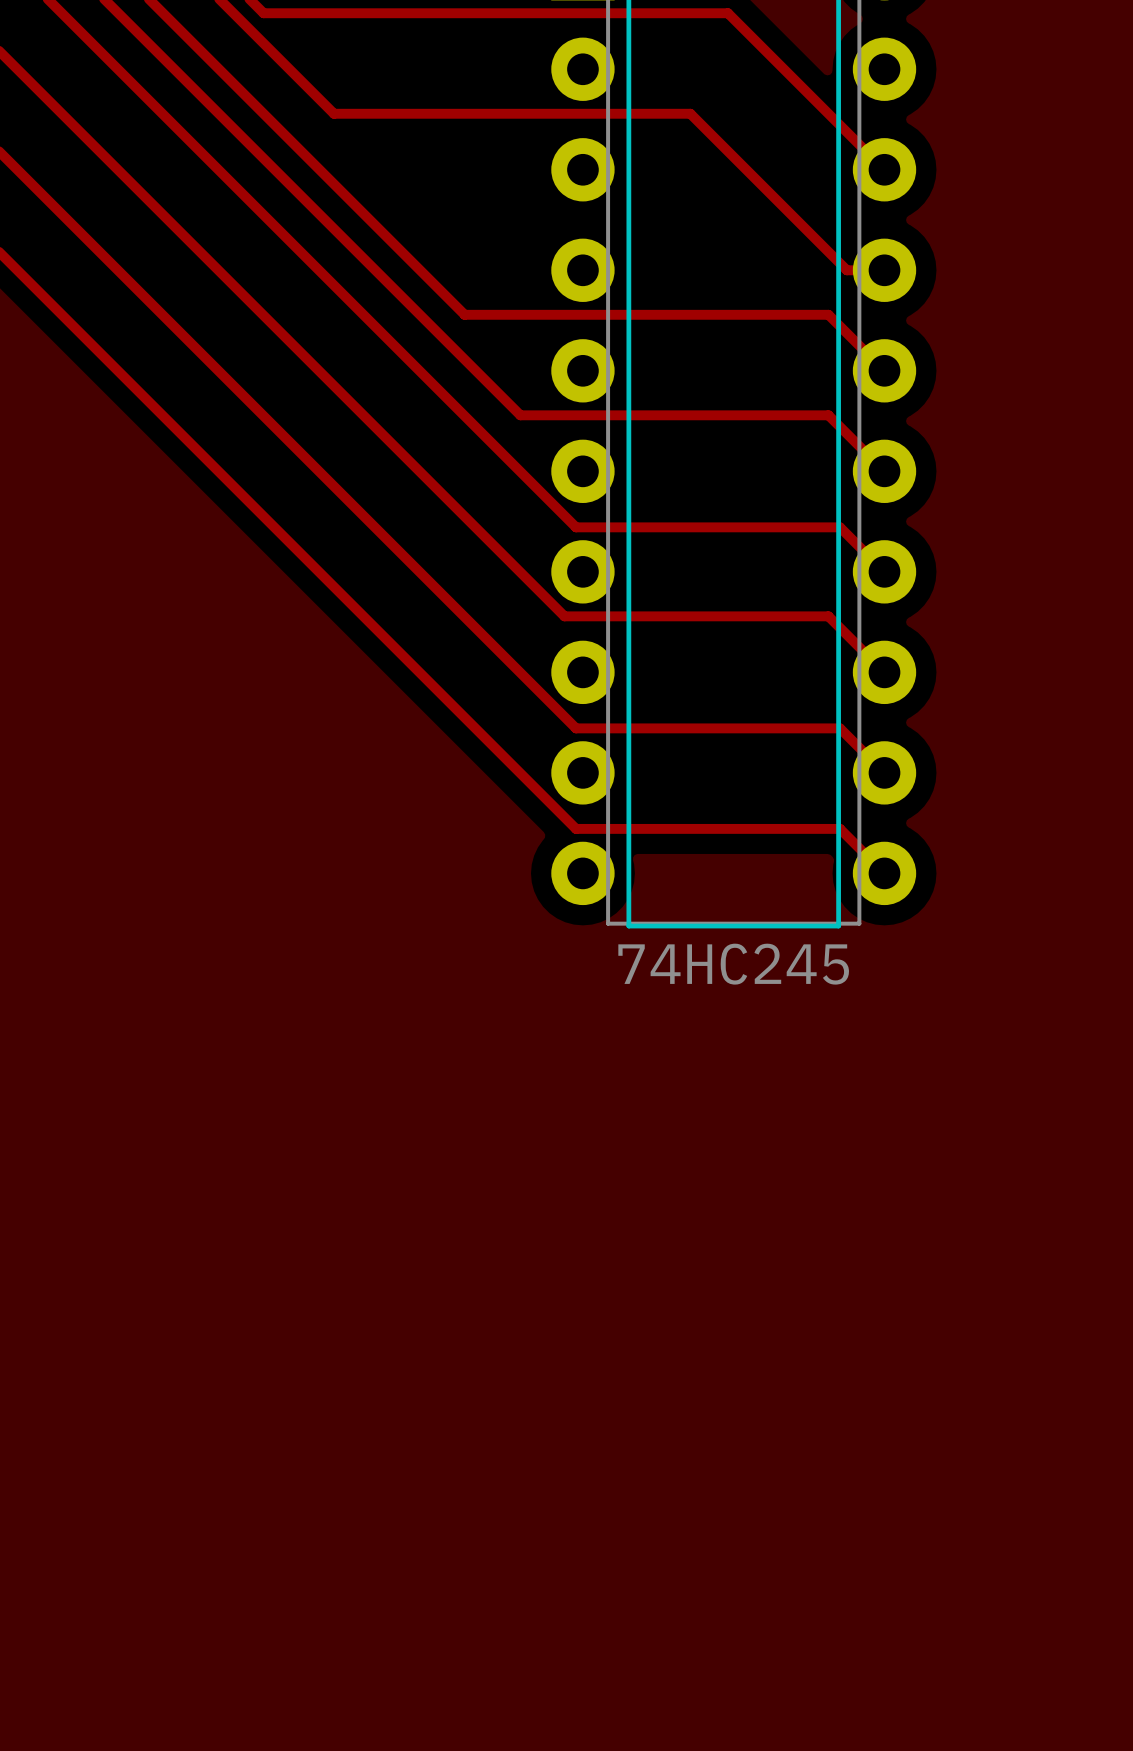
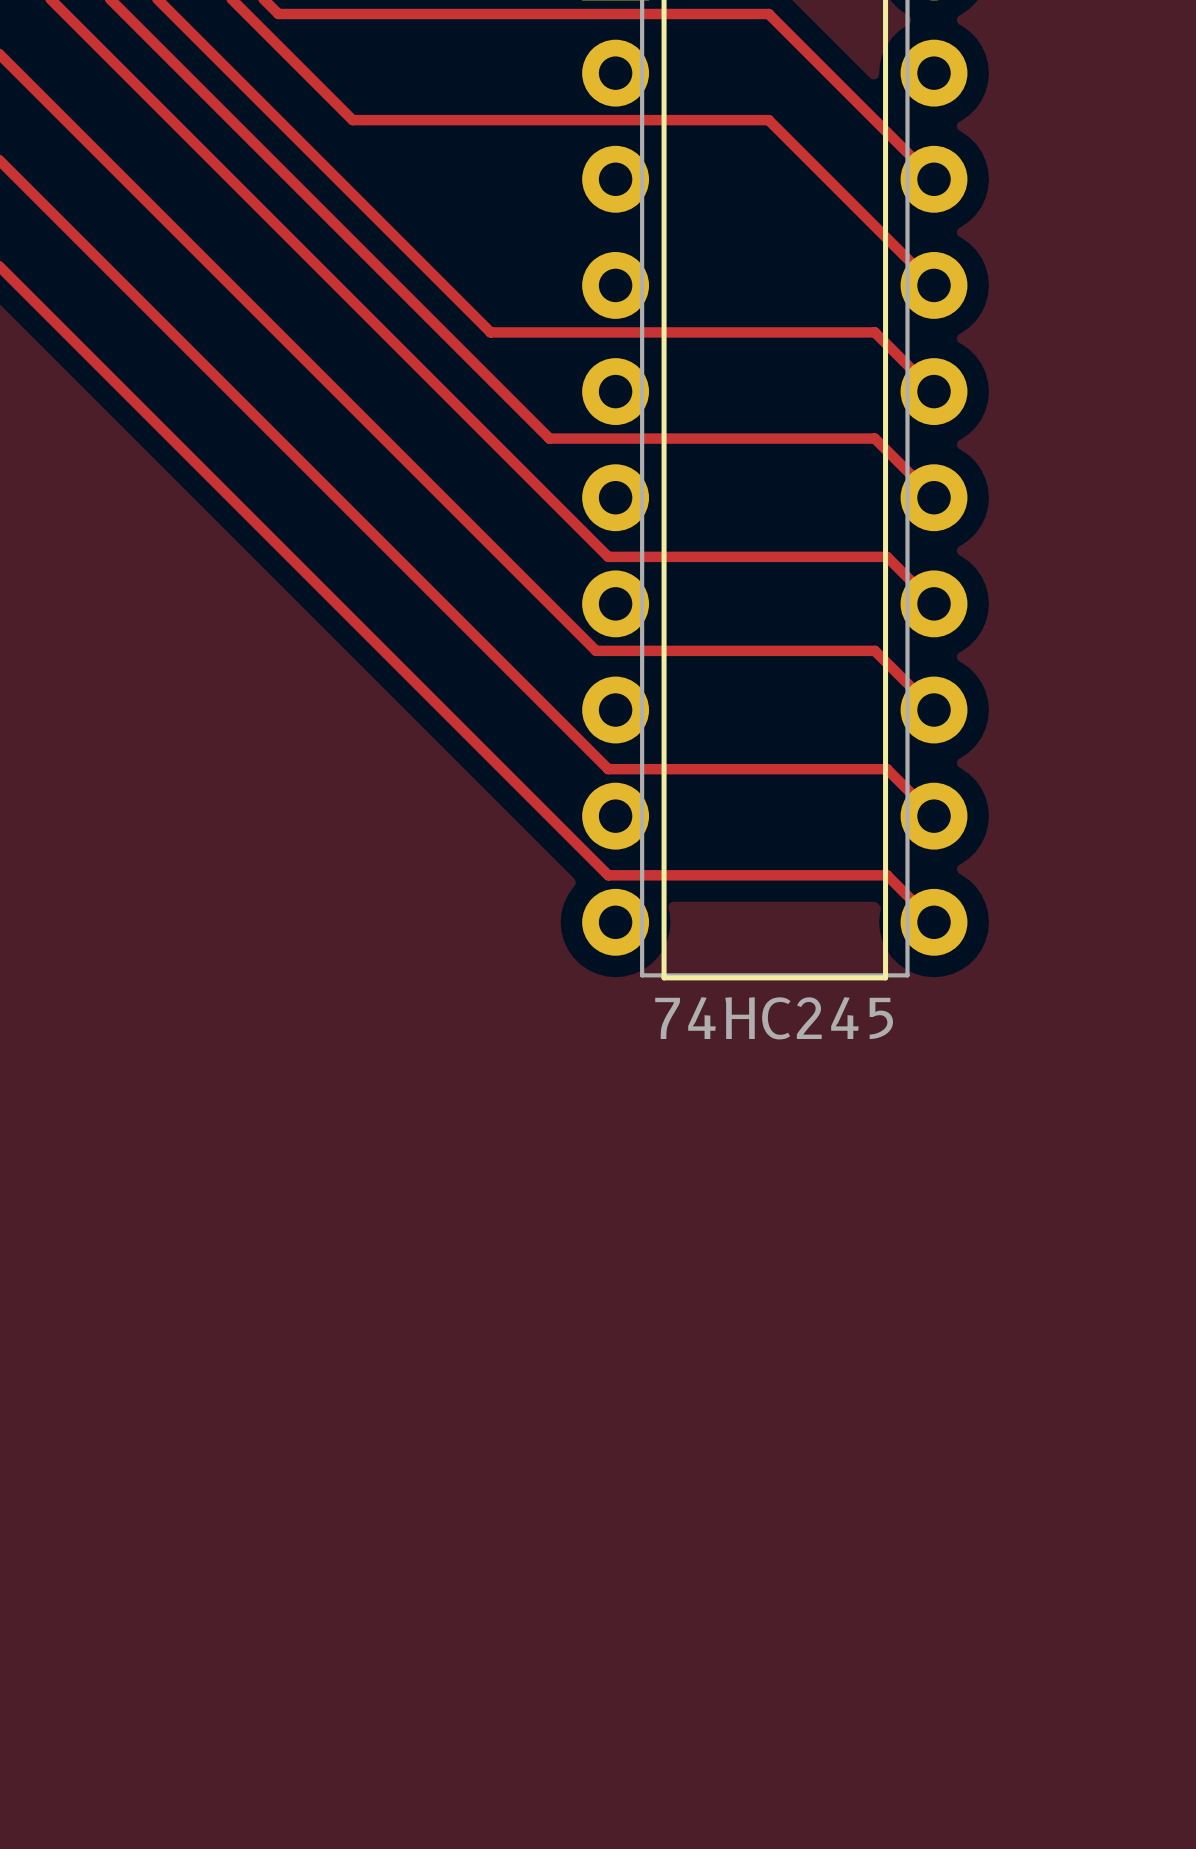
track: (690, 113) (846, 270) (884, 270) -> (729, 120) (768, 120) (934, 285)

